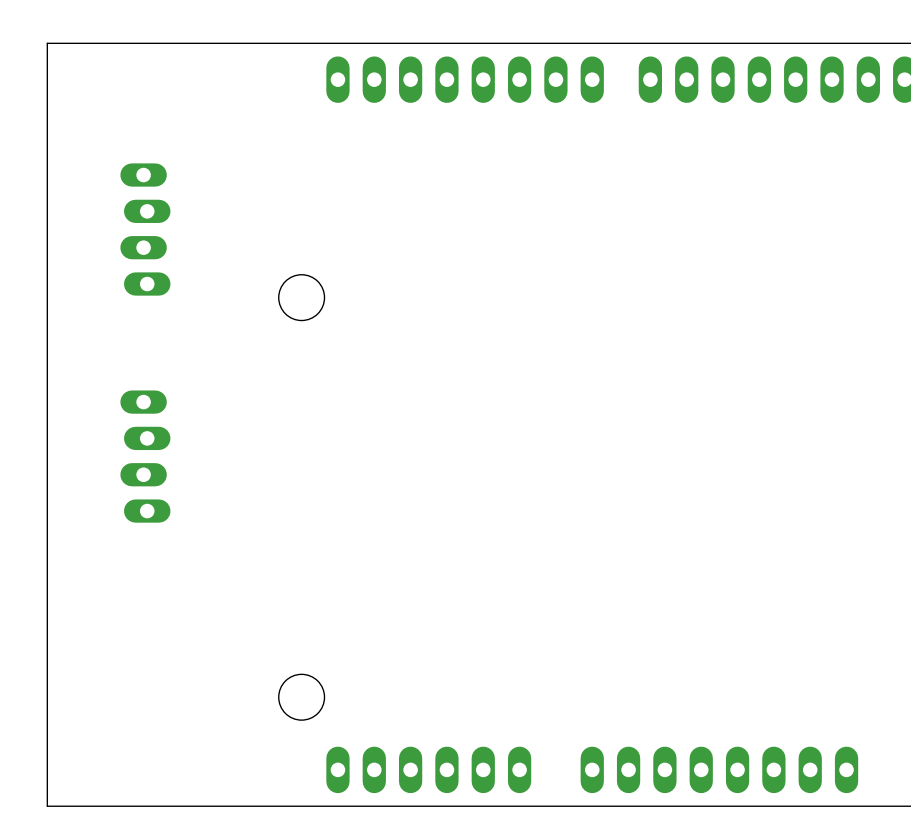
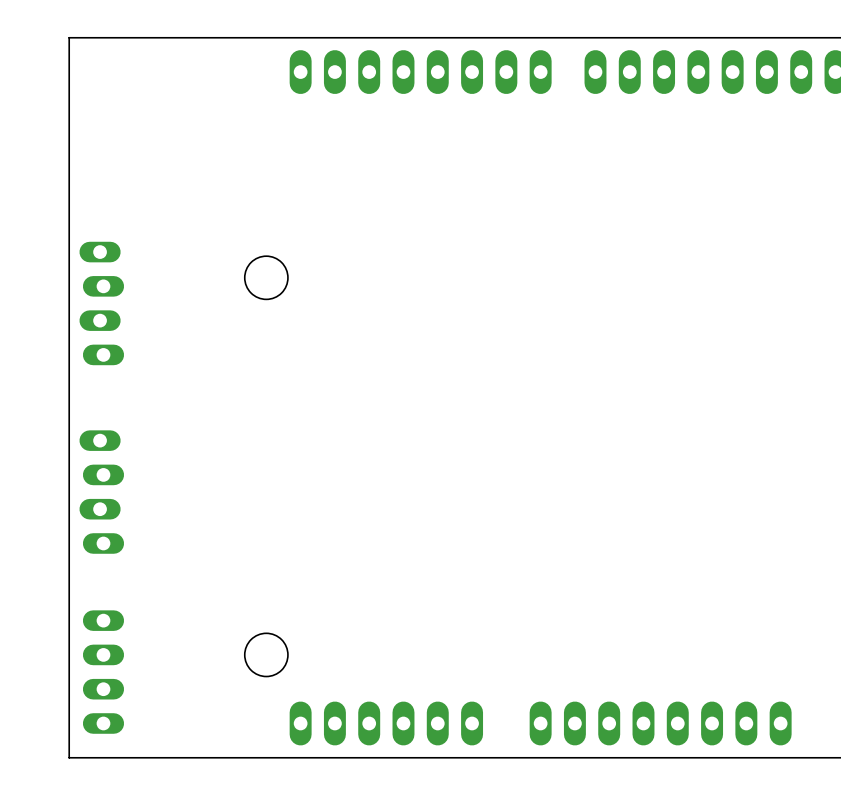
board edge: (92, 43) (47, 43) (47, 806) (92, 806) -> (69, 37) (69, 757)
part: (145, 229) -> none
part: none -> (101, 303)
part: (145, 456) -> none
part: none -> (101, 492)
part: none -> (103, 672)

